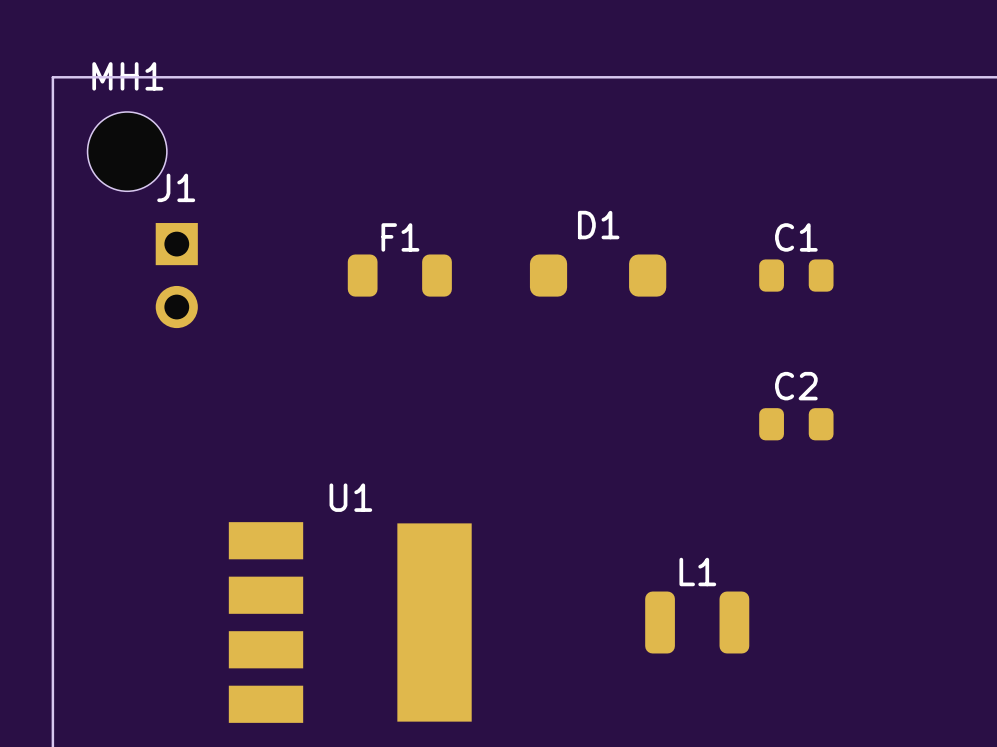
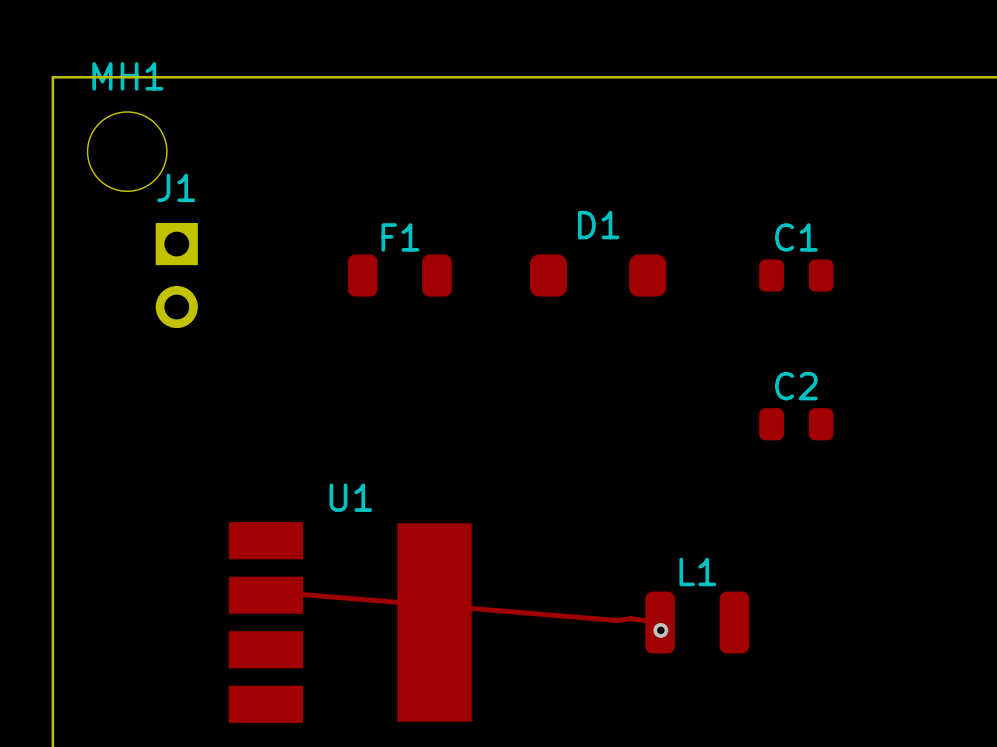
track: none -> (266, 595) (301, 594) (617, 620) (630, 618) (660, 622) (660, 630)
via: none -> (660, 630)

